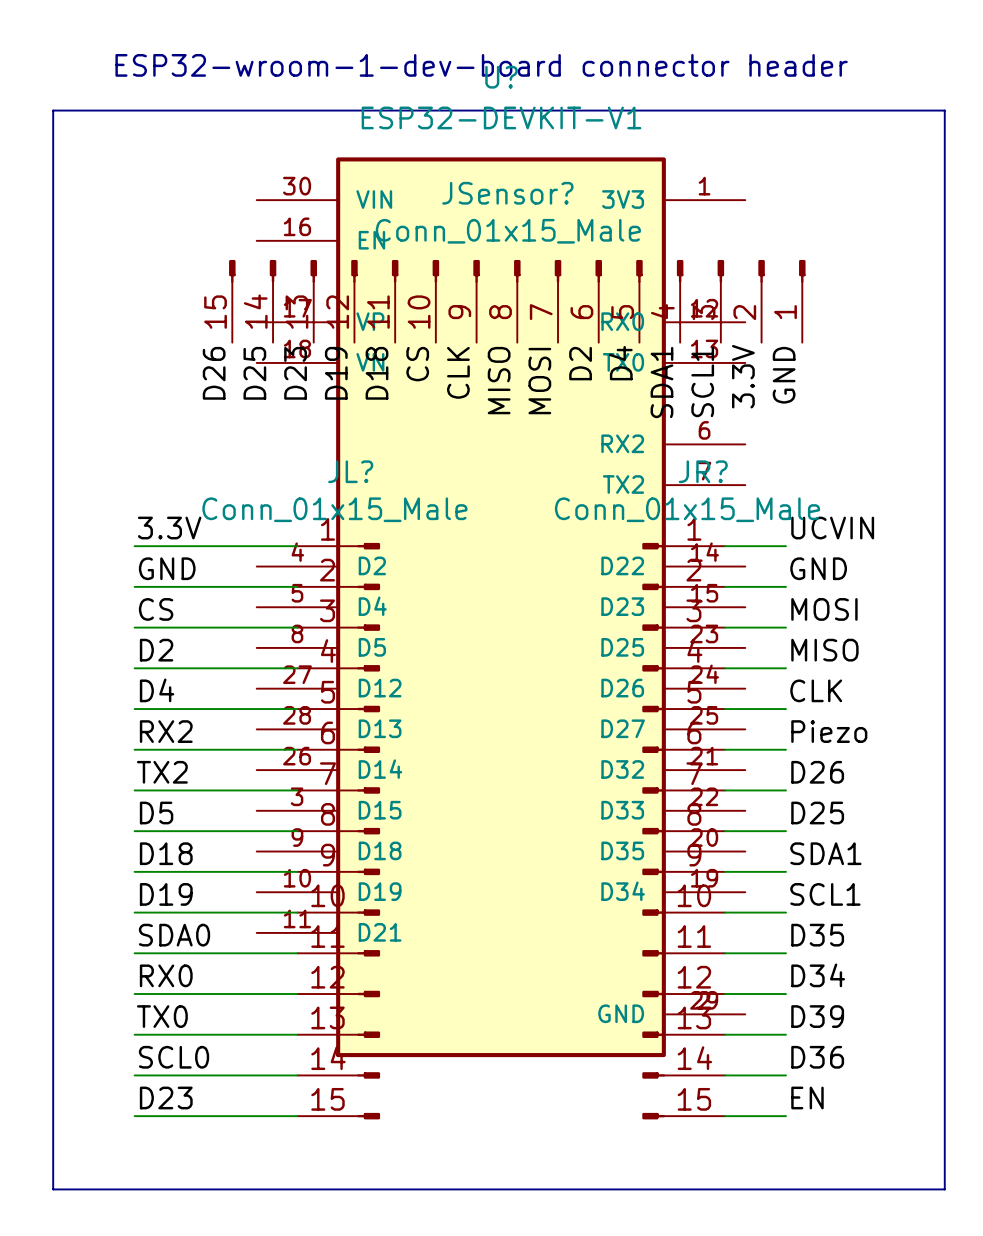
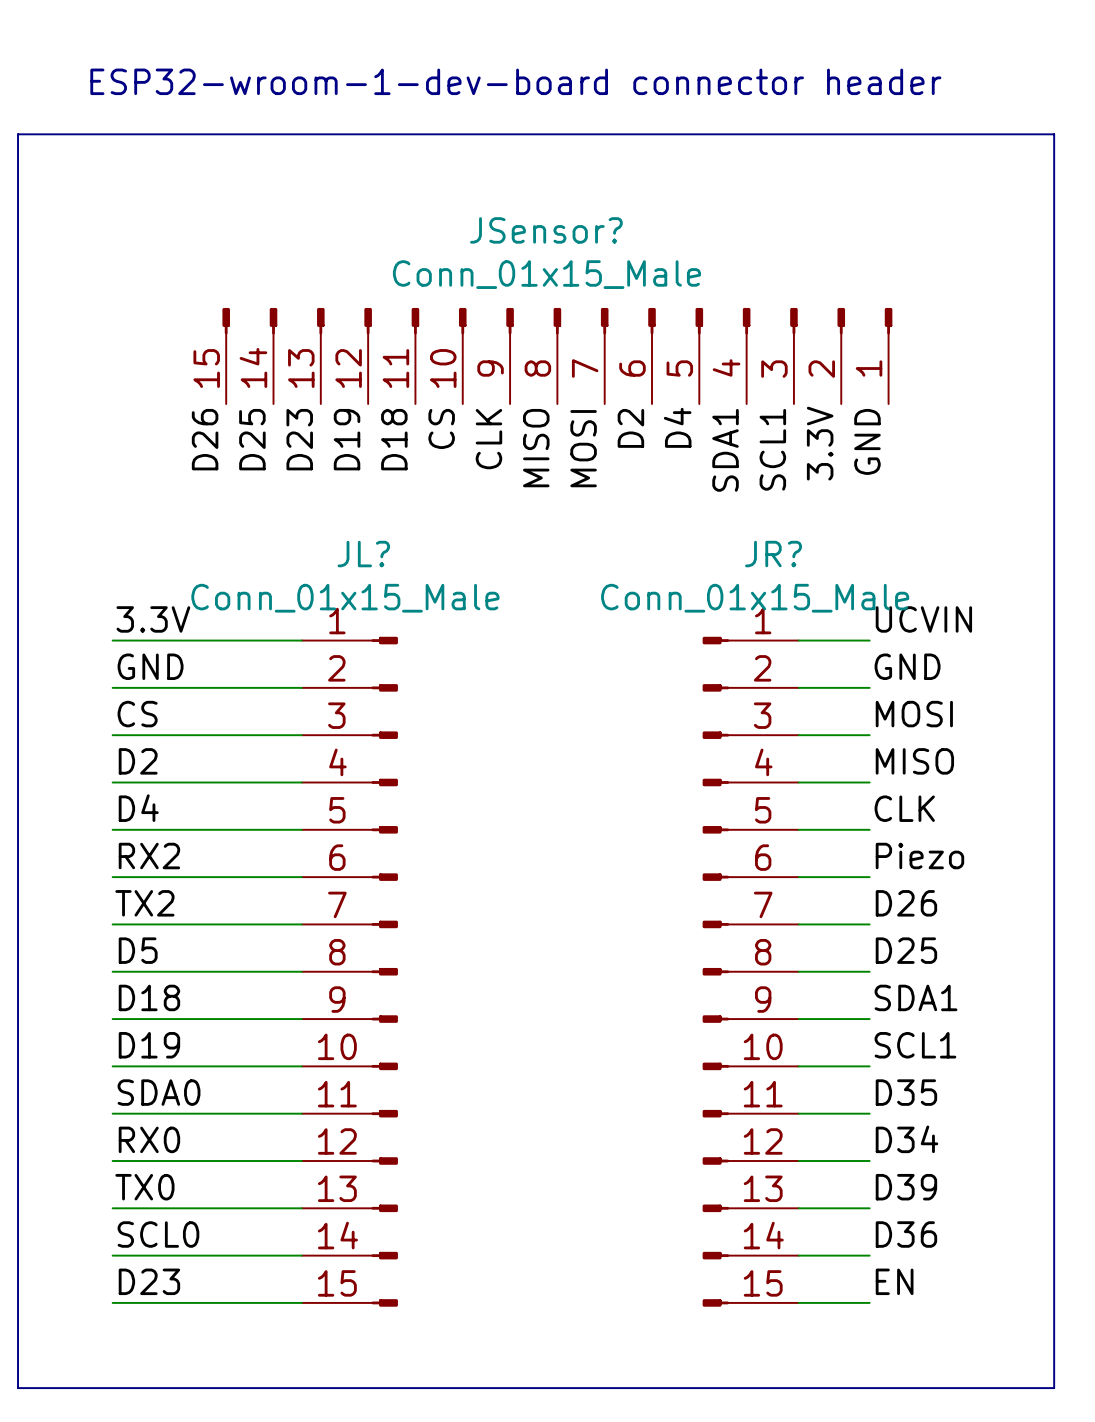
U?: ESP32-DEVKIT-V1 (501, 607) -> none

